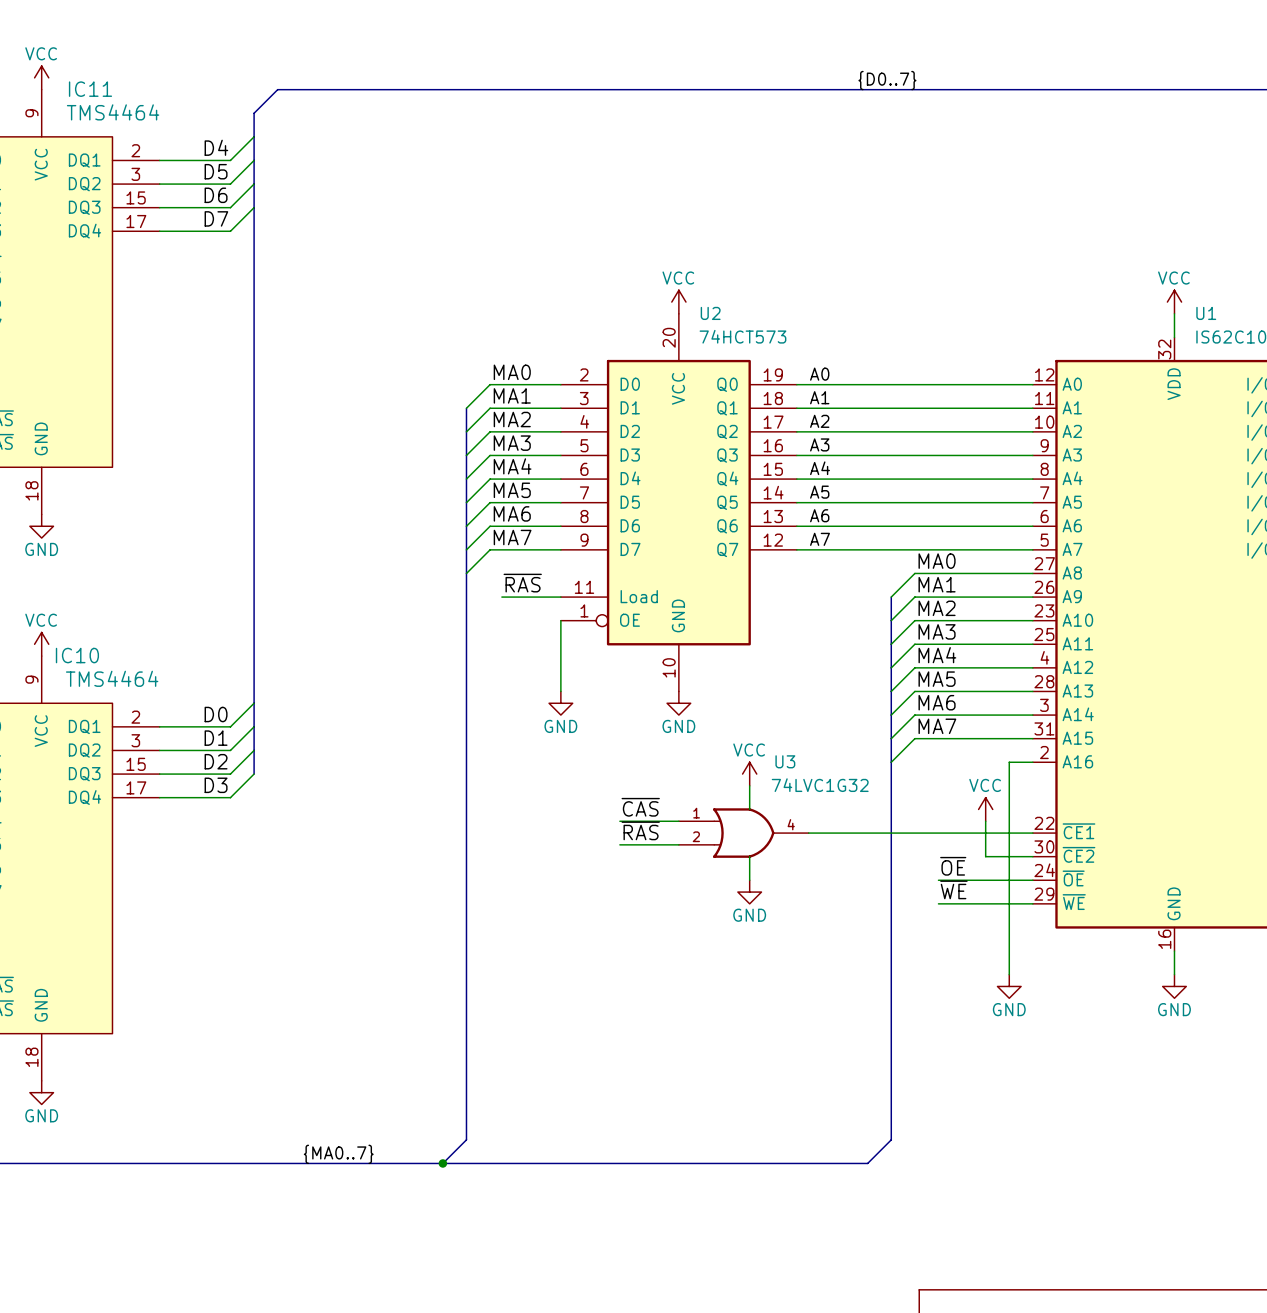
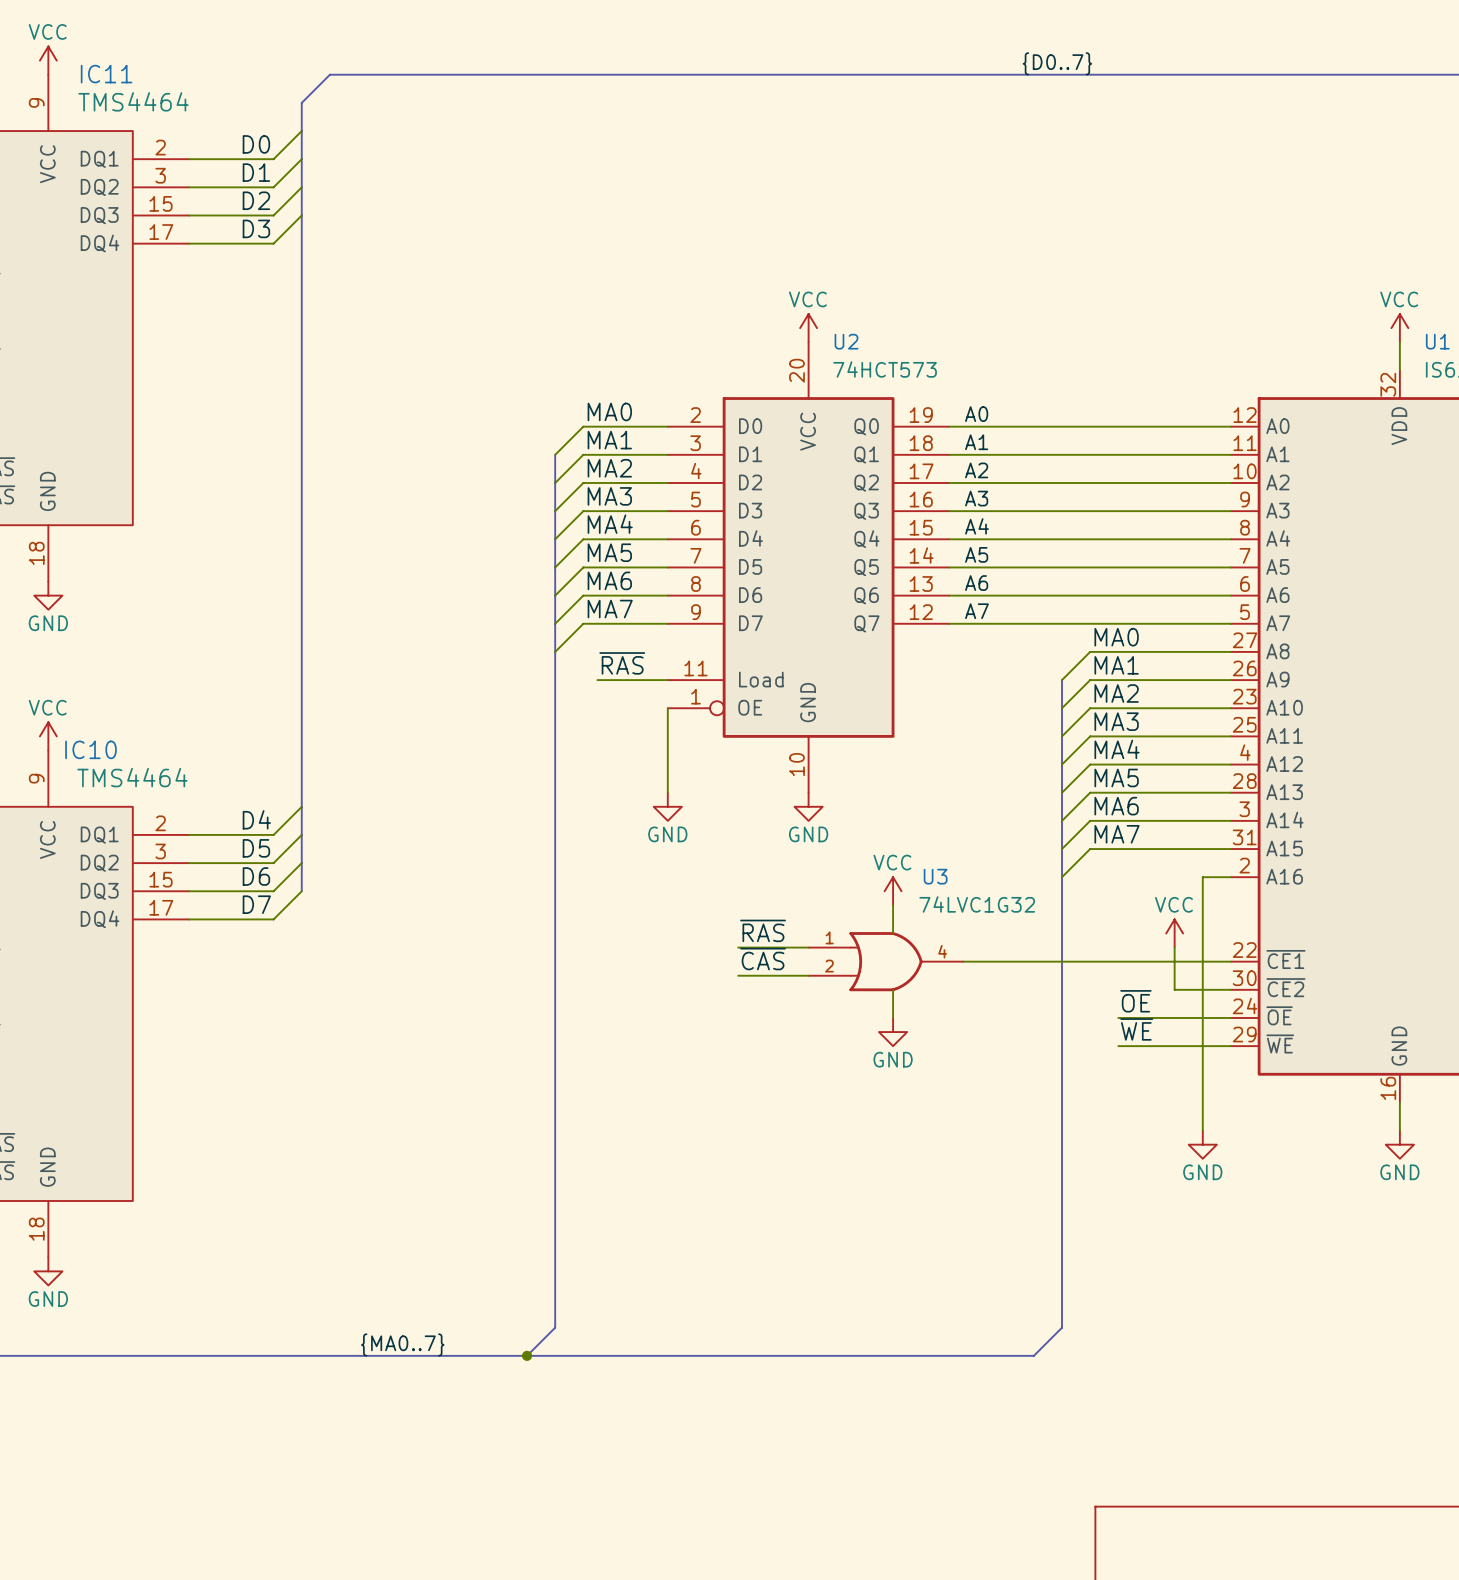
label: D4 (216, 147) -> D0 (256, 144)
label: D5 (216, 171) -> D1 (256, 172)
label: D6 (216, 195) -> D2 (256, 200)
label: D7 (216, 218) -> D3 (256, 228)
label: D0 (216, 714) -> D4 (256, 819)
label: D1 (216, 738) -> D5 (256, 848)
label: D2 (216, 761) -> D6 (256, 876)
label: D3 (216, 785) -> D7 (256, 904)
label: ~{CAS} (640, 807) -> ~{RAS} (763, 930)
label: ~{RAS} (640, 830) -> ~{CAS} (763, 959)

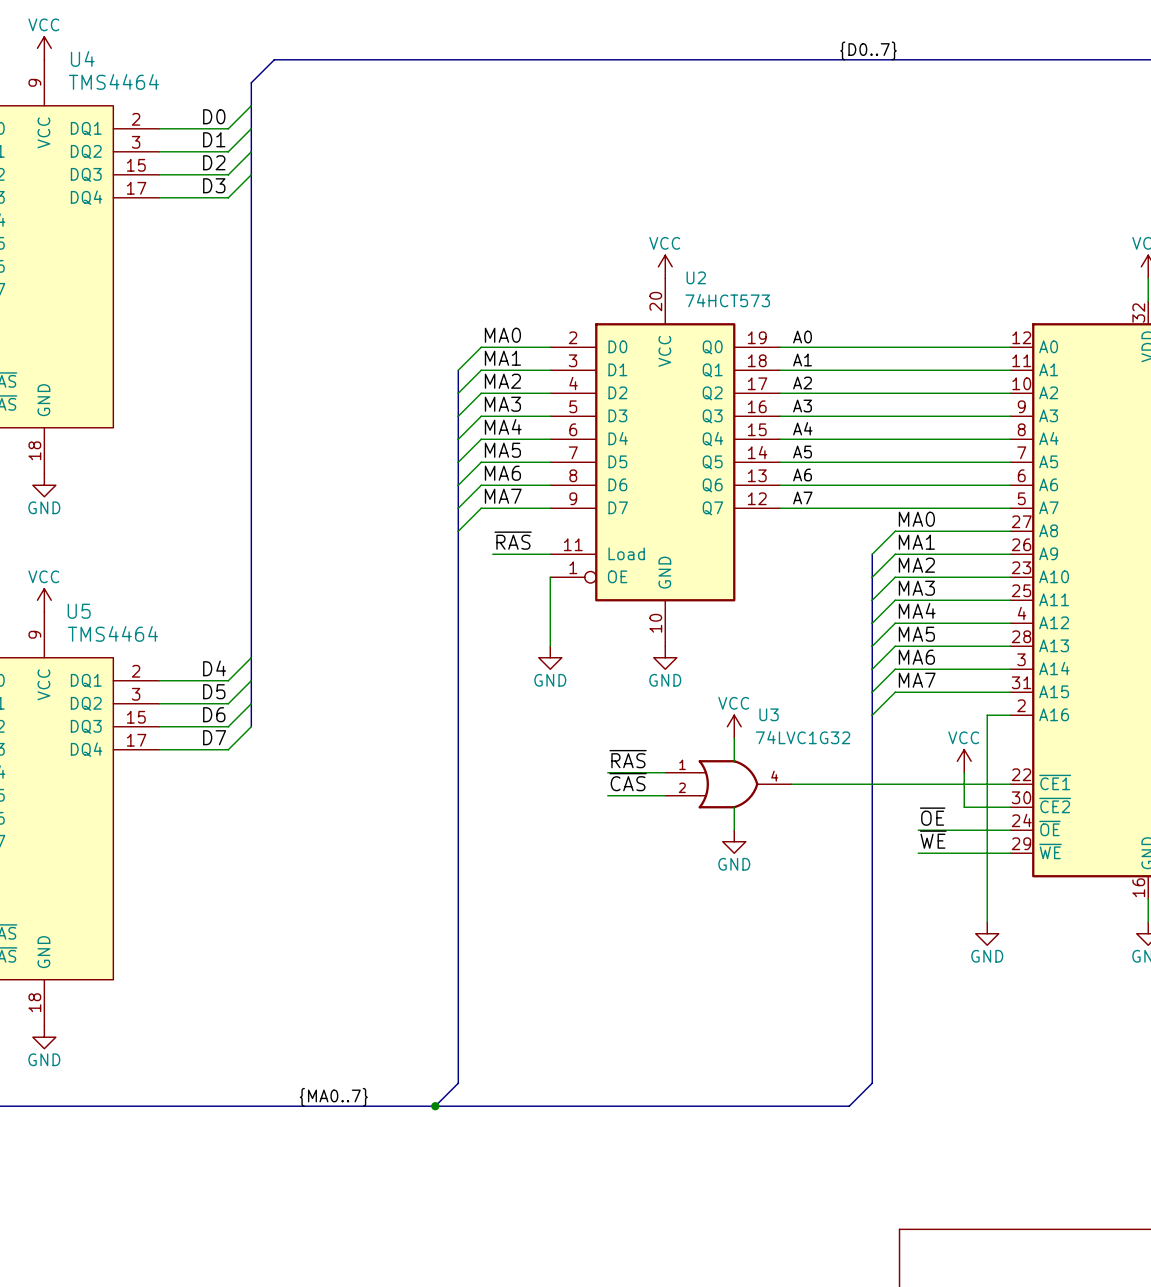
IC11 name: IC11 (106, 74) -> U4 (82, 58)
IC10 name: IC10 (90, 749) -> U5 (79, 611)

